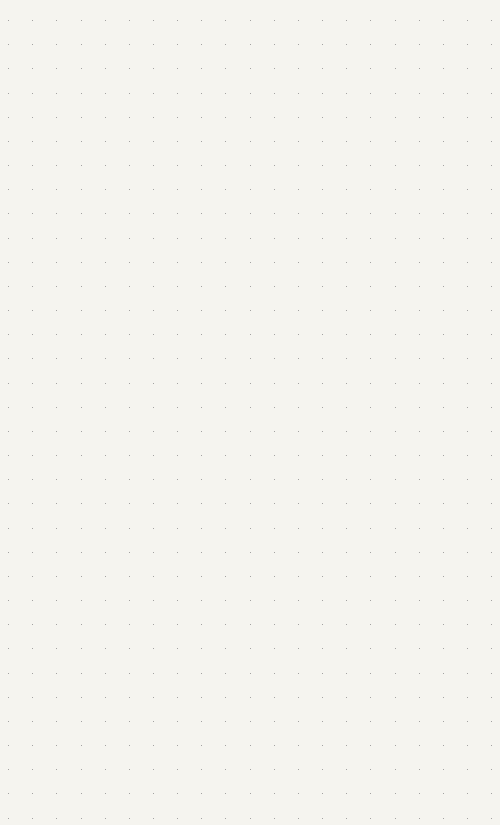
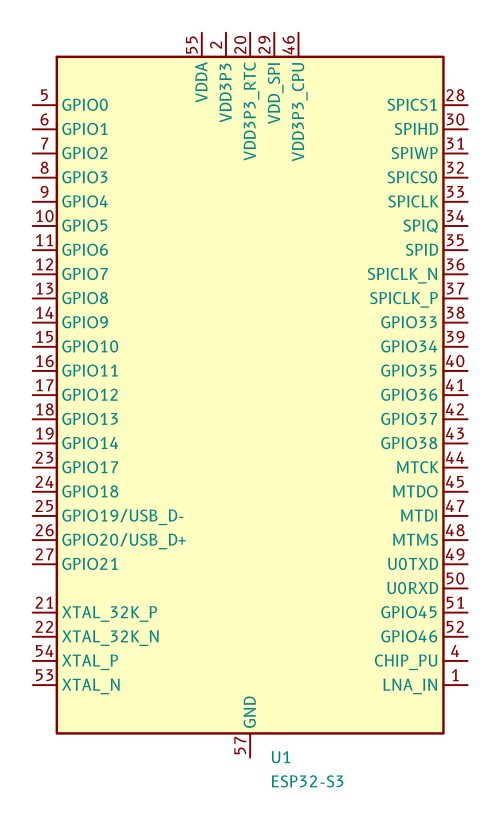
U1: none -> ESP32-S3 (250, 395)

